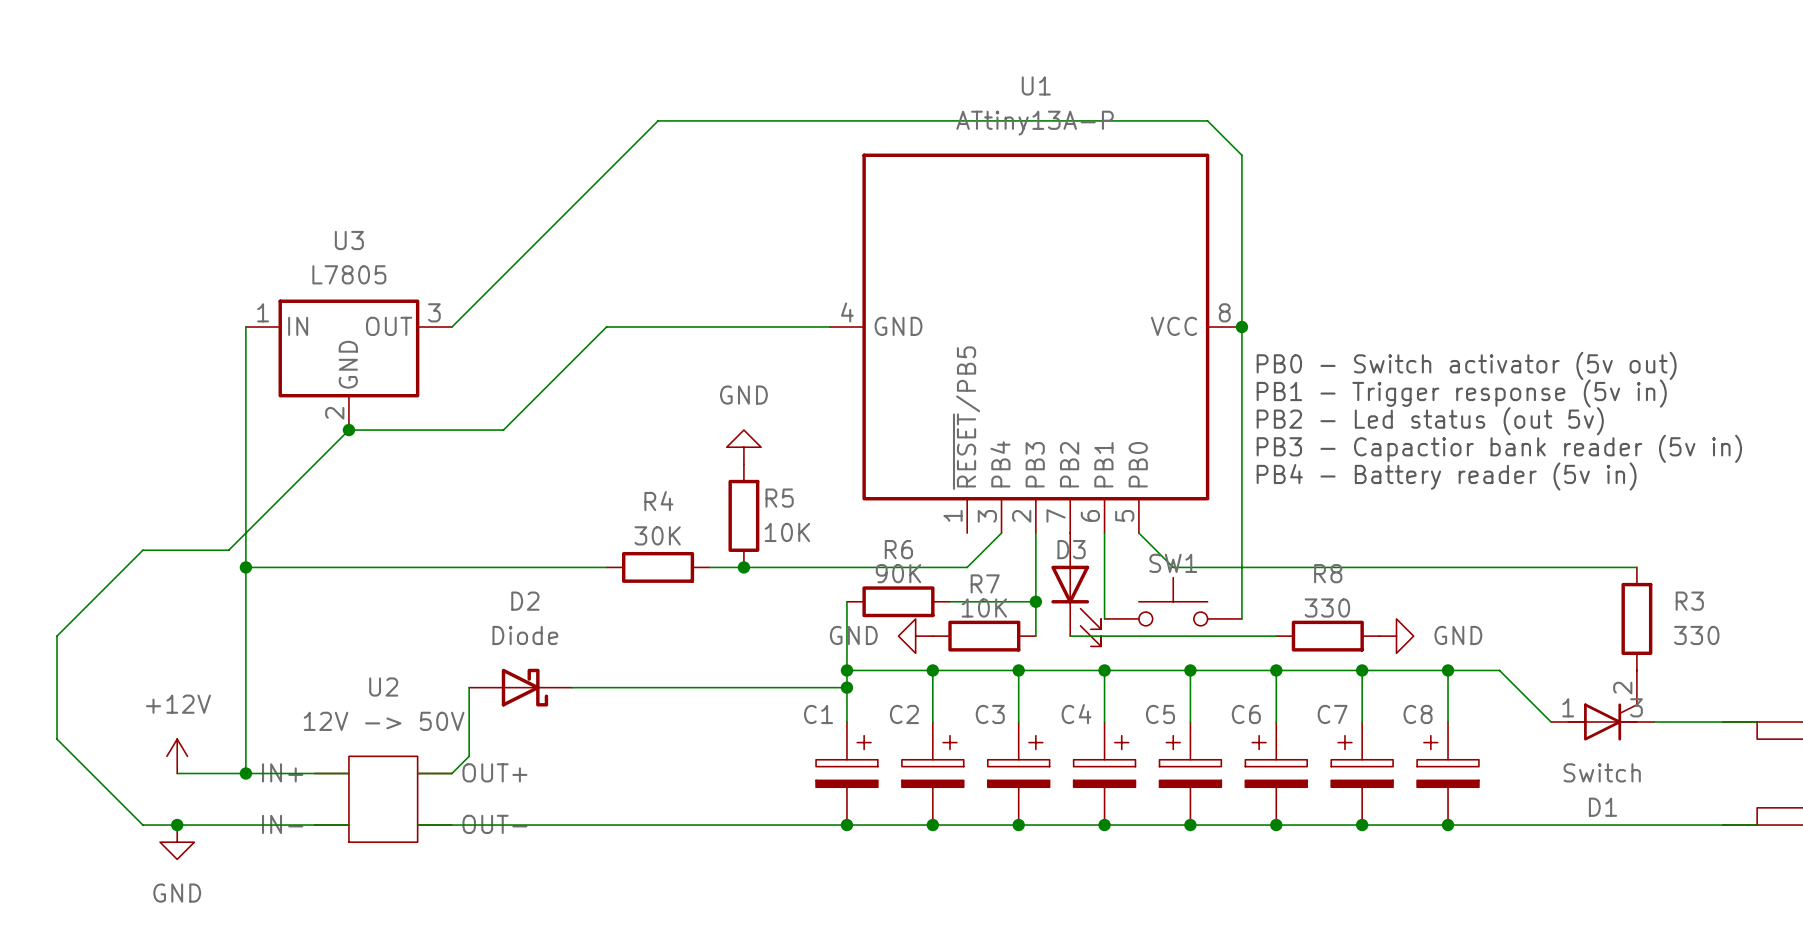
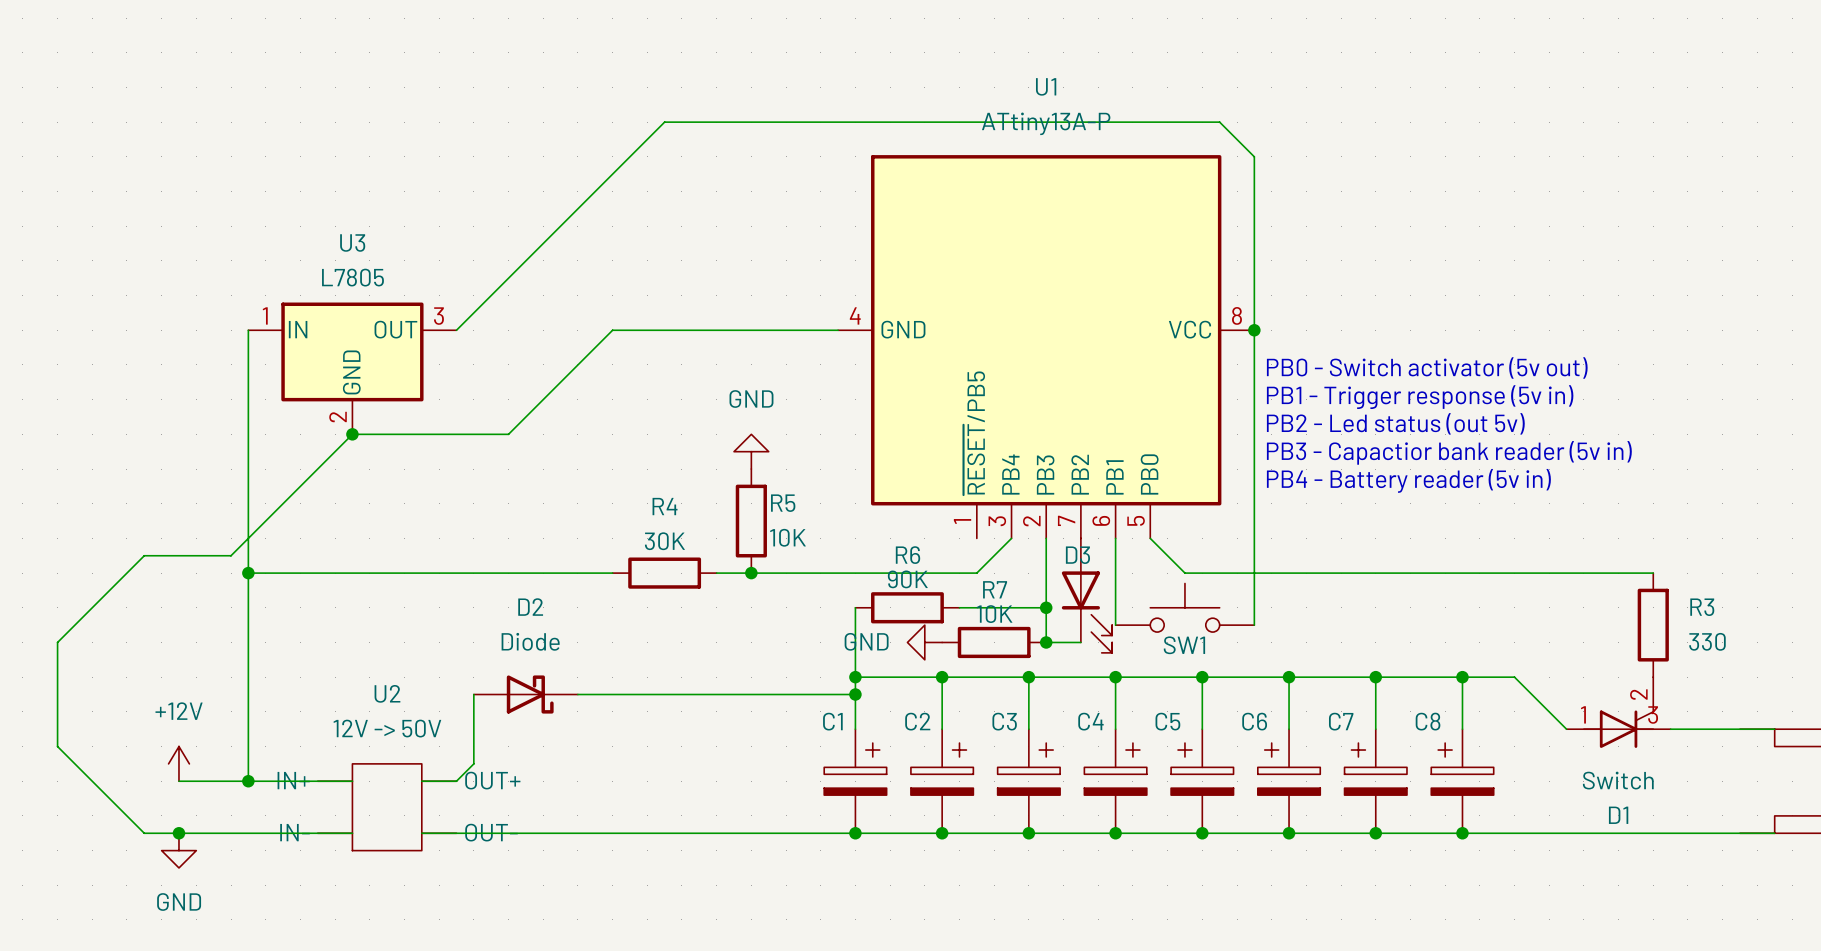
SW1 name position: SW1 (1173, 563) -> SW1 (1184, 645)
junction: none -> (1046, 642)
wire: (1070, 636) (1276, 636) -> (1080, 642) (1046, 642)
R8: 330 (1327, 636) -> none
power symbol: GND (1396, 636) -> none

